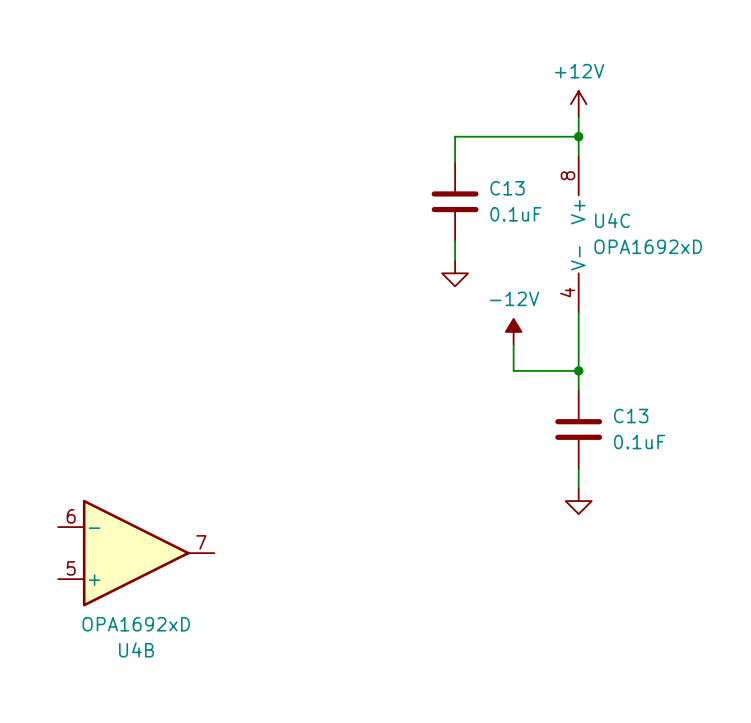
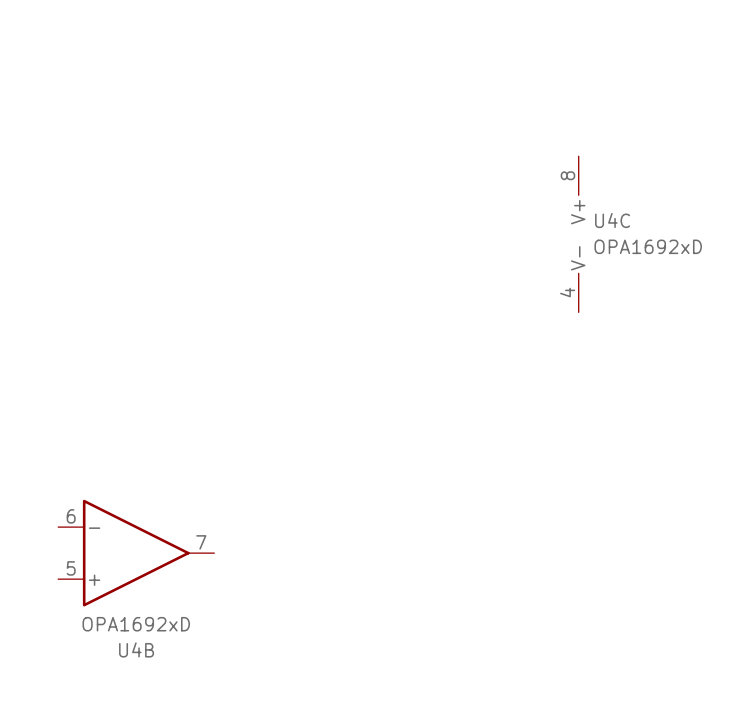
power symbol: +12V (578, 104) -> none
wire: (578, 117) (578, 156) -> none
wire: (578, 136) (455, 136) (455, 162) -> none
junction: (578, 136) -> none
C13: 0.1uF (455, 201) -> none
wire: (455, 240) (455, 260) -> none
power symbol: (455, 273) -> none
wire: (578, 312) (578, 390) -> none
power symbol: -12V (513, 331) -> none
wire: (513, 344) (513, 370) (578, 370) -> none
junction: (578, 370) -> none
C13: 0.1uF (578, 429) -> none
wire: (578, 468) (578, 488) -> none
power symbol: (578, 501) -> none

